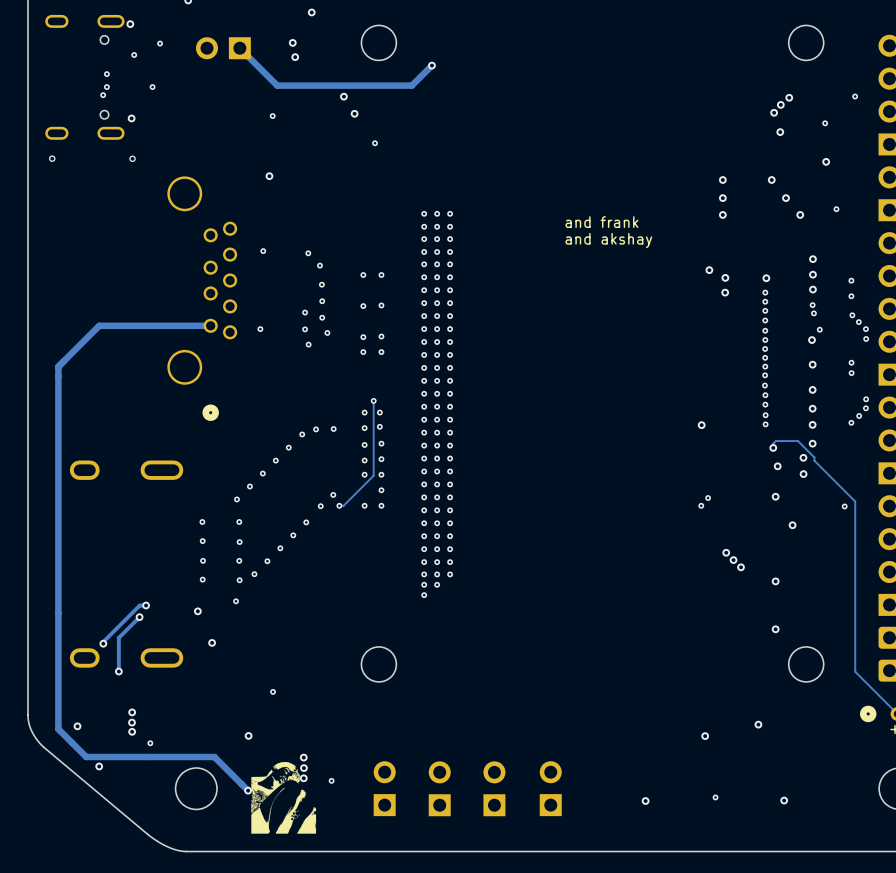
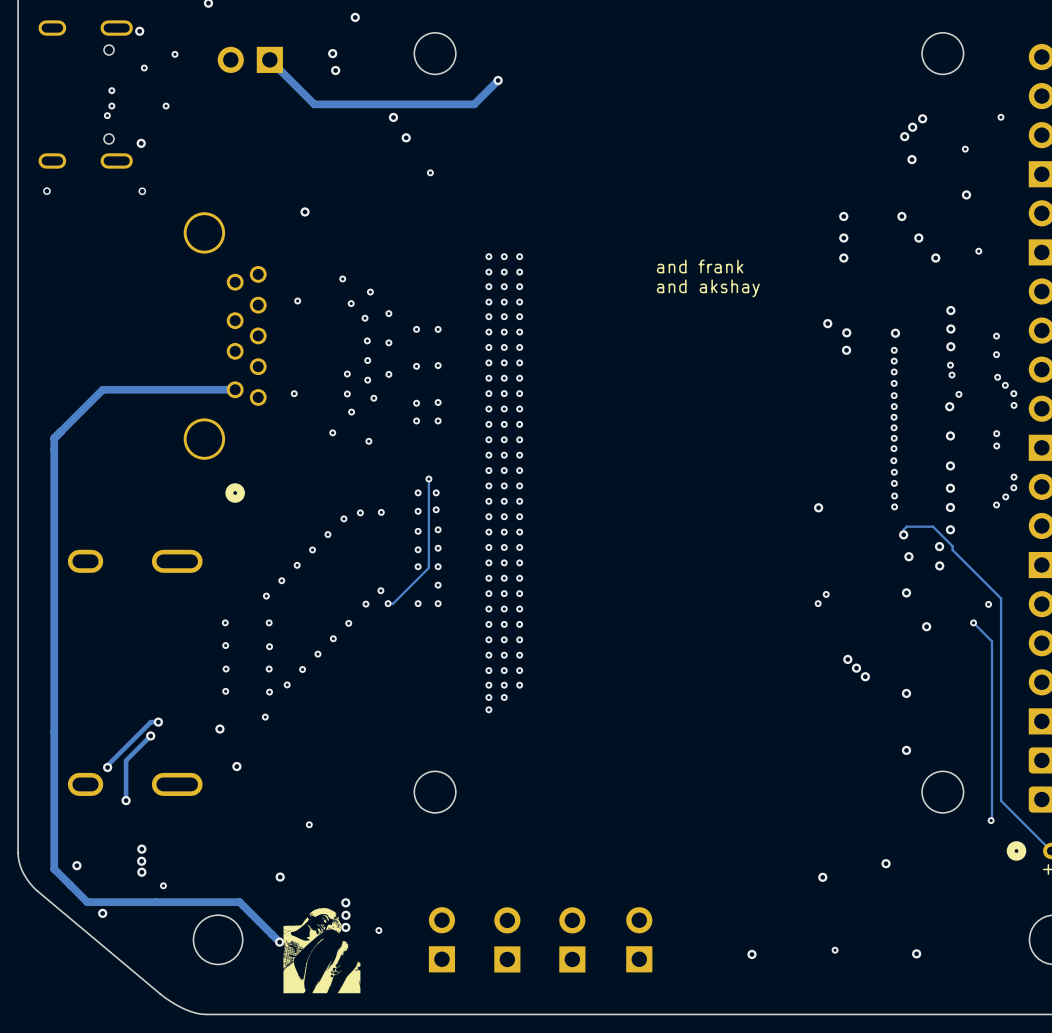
via: (272, 116) -> none
via: none -> (342, 278)
via: none -> (370, 292)
via: none -> (388, 313)
via: none -> (388, 342)
via: none -> (388, 374)
via: none -> (332, 432)
via: none -> (368, 441)
track: none -> (973, 622) (992, 641) (991, 820)
via: none -> (973, 622)
via: none -> (991, 820)

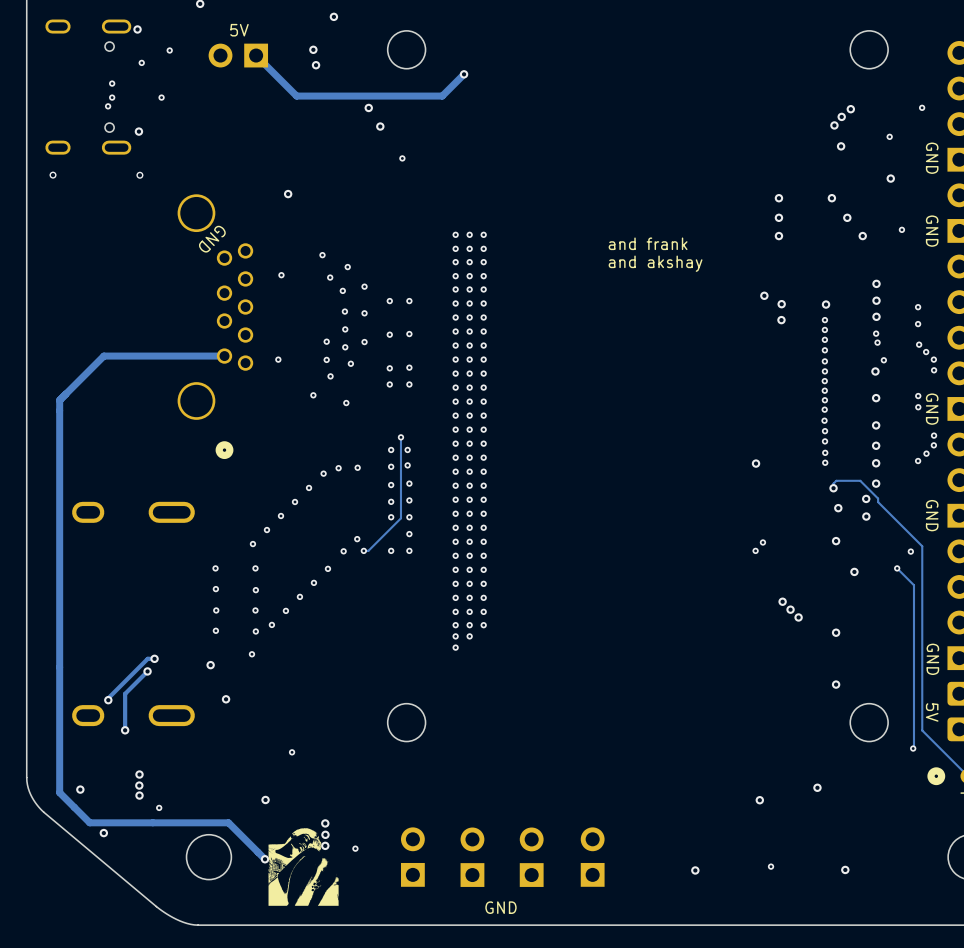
text: none -> 5V (239, 30)
text: none -> GND (932, 158)
text: none -> GND (932, 231)
text: none -> GND (212, 239)
text: none -> GND (932, 409)
text: none -> GND (932, 515)
text: none -> GND (932, 659)
text: none -> 5V (932, 712)
text: none -> GND (500, 907)

